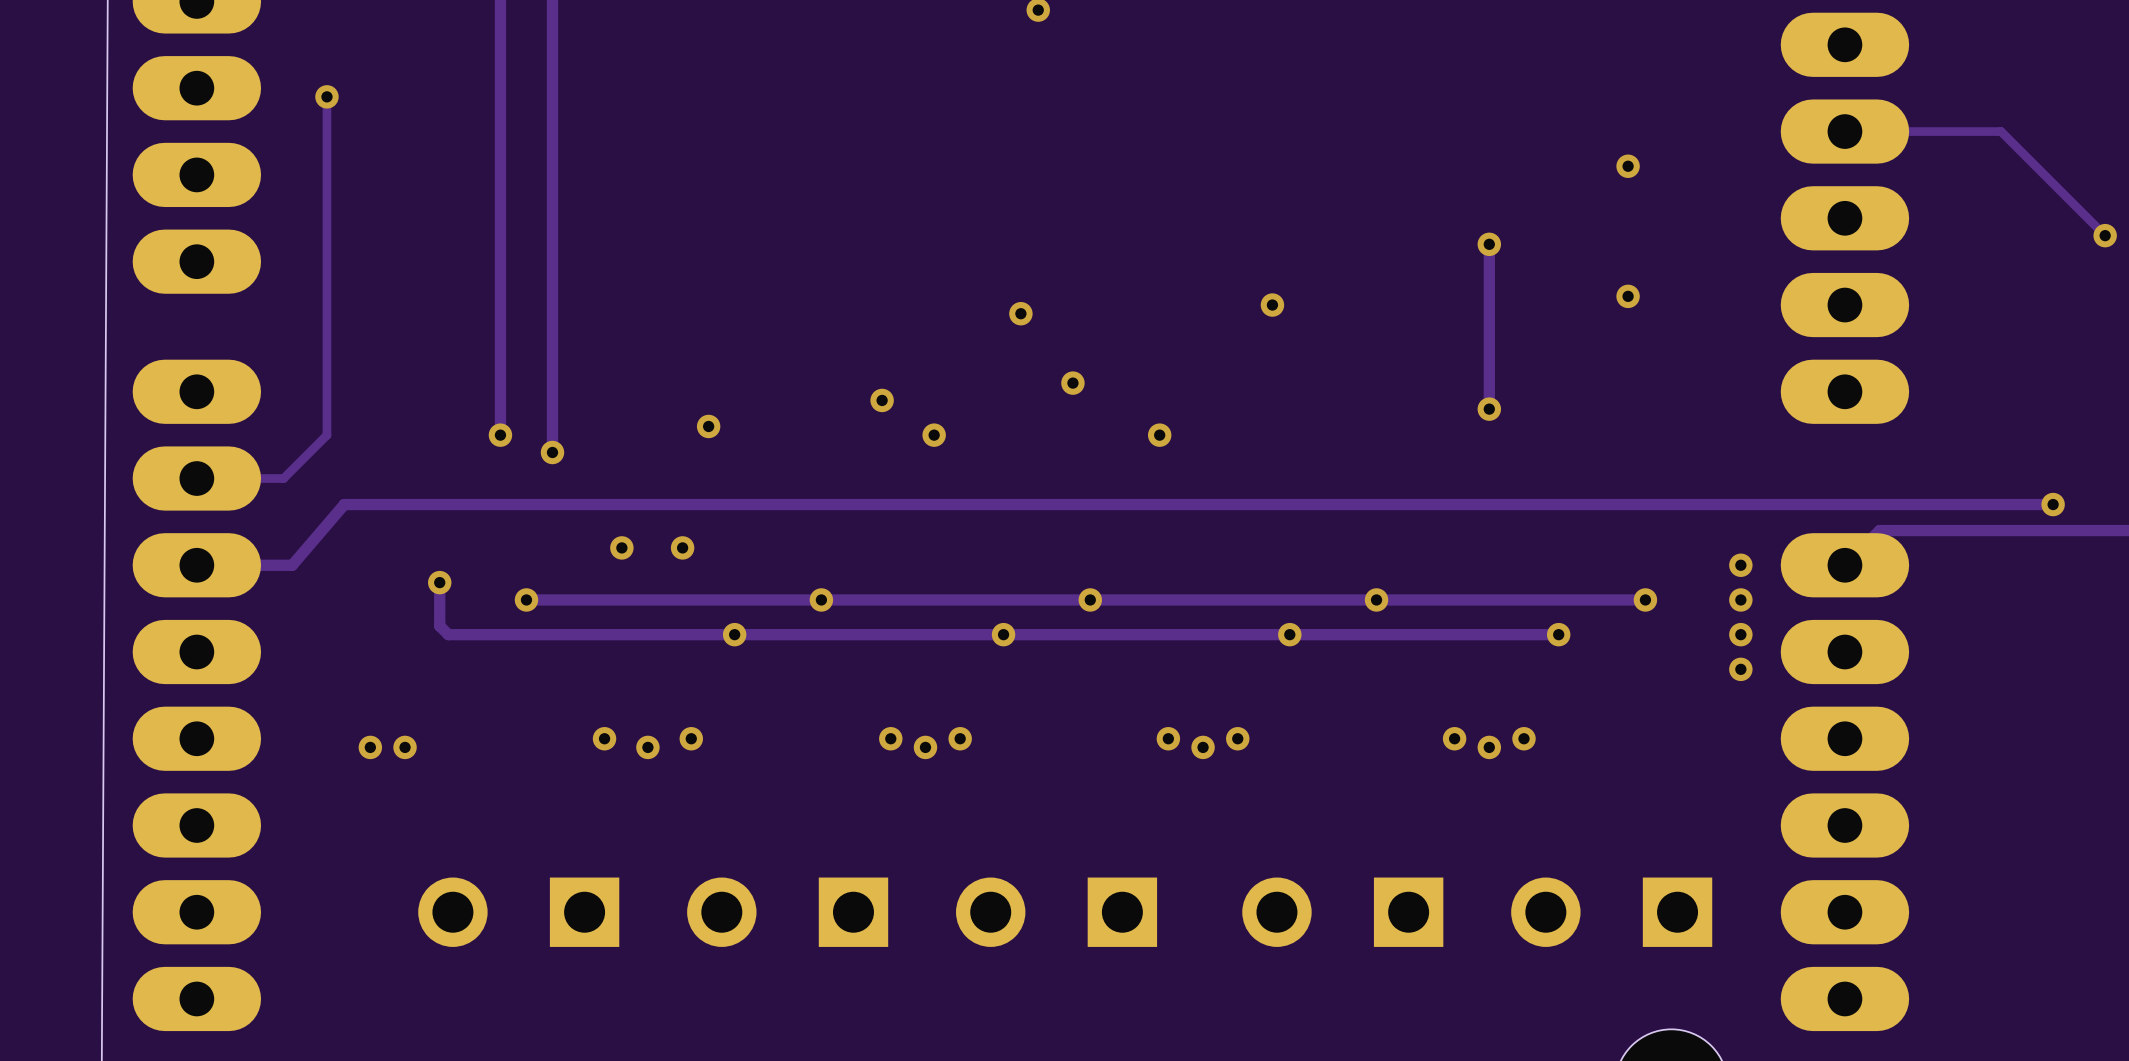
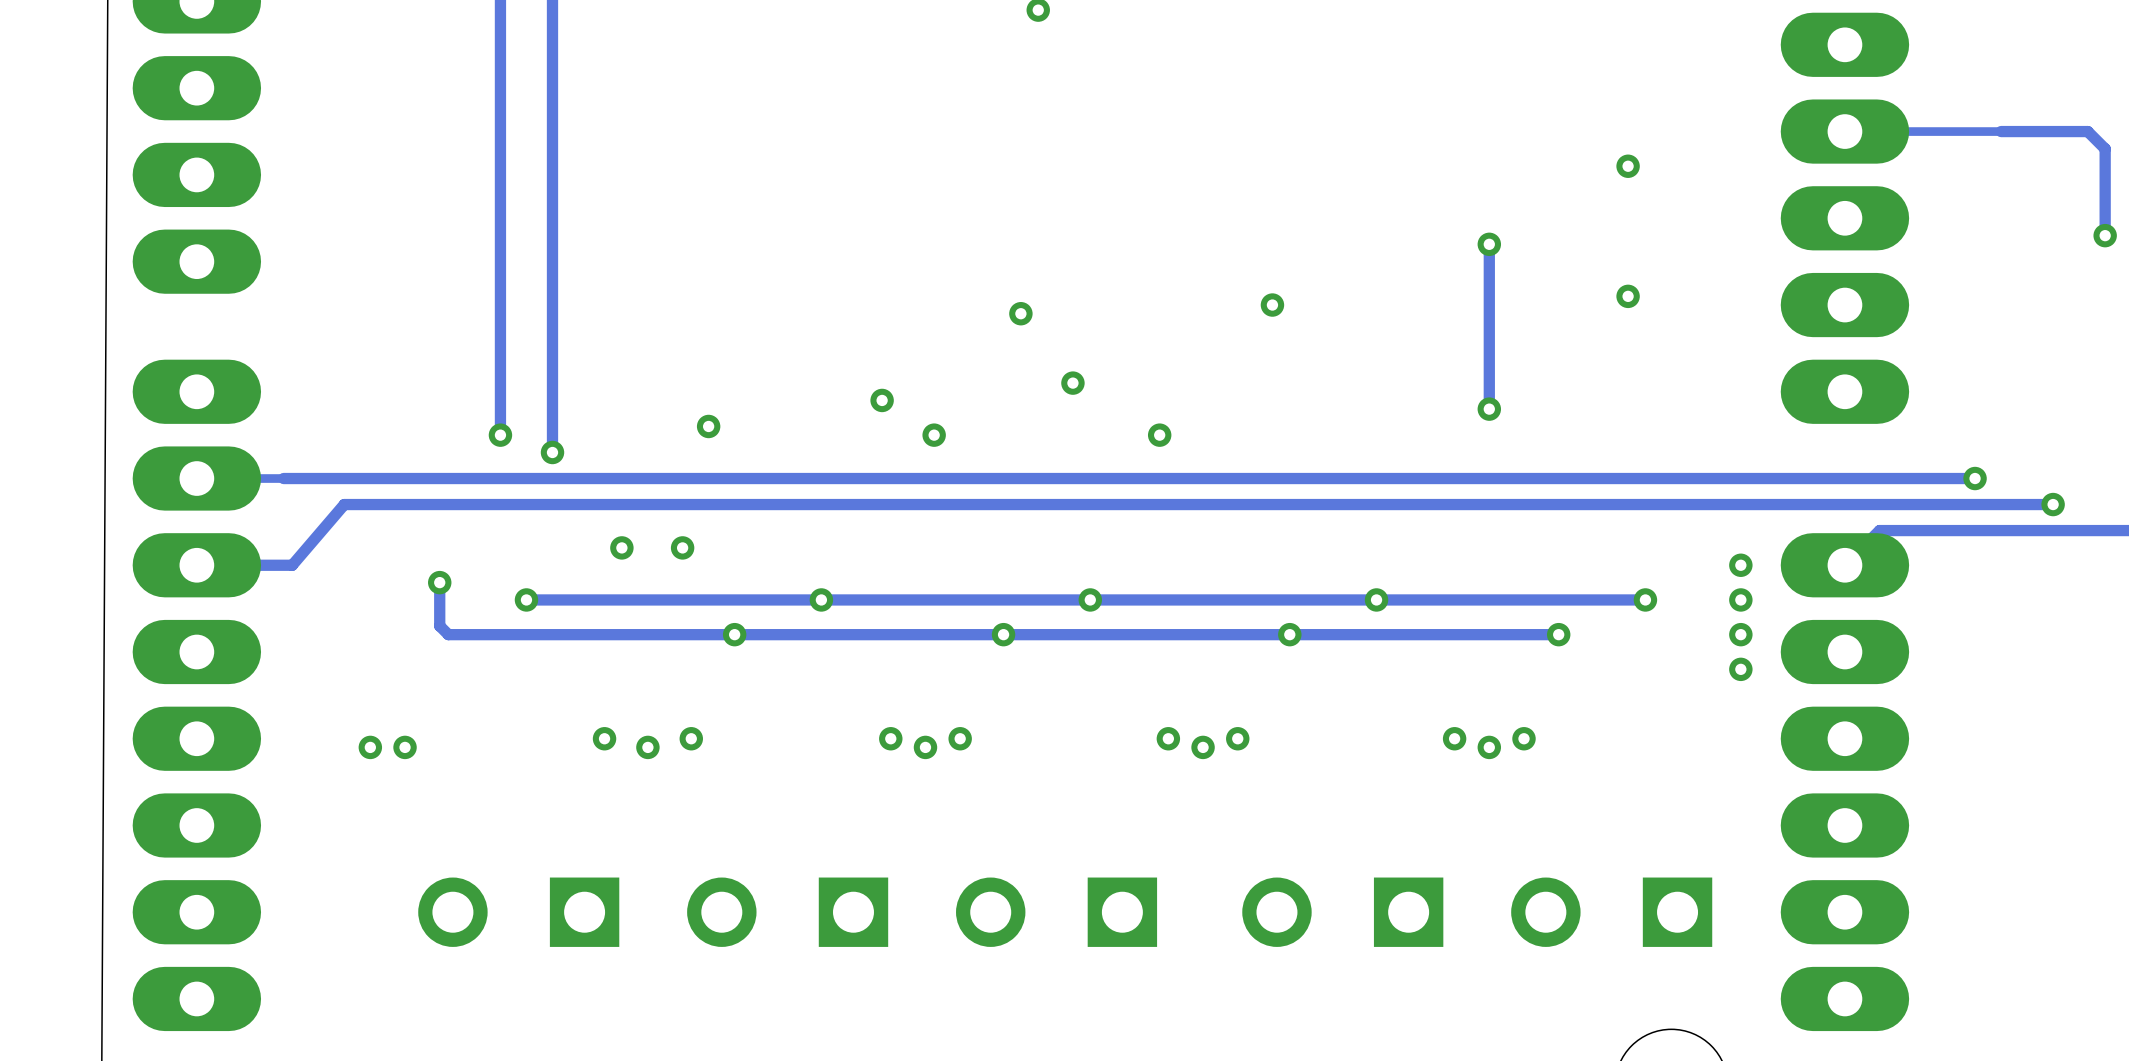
track: (326, 96) (326, 435) (283, 478) -> (1975, 478) (283, 478)
via: (326, 96) -> none
track: (2001, 131) (2105, 235) -> (2001, 131) (2087, 131) (2105, 148) (2105, 235)
via: none -> (1975, 478)

